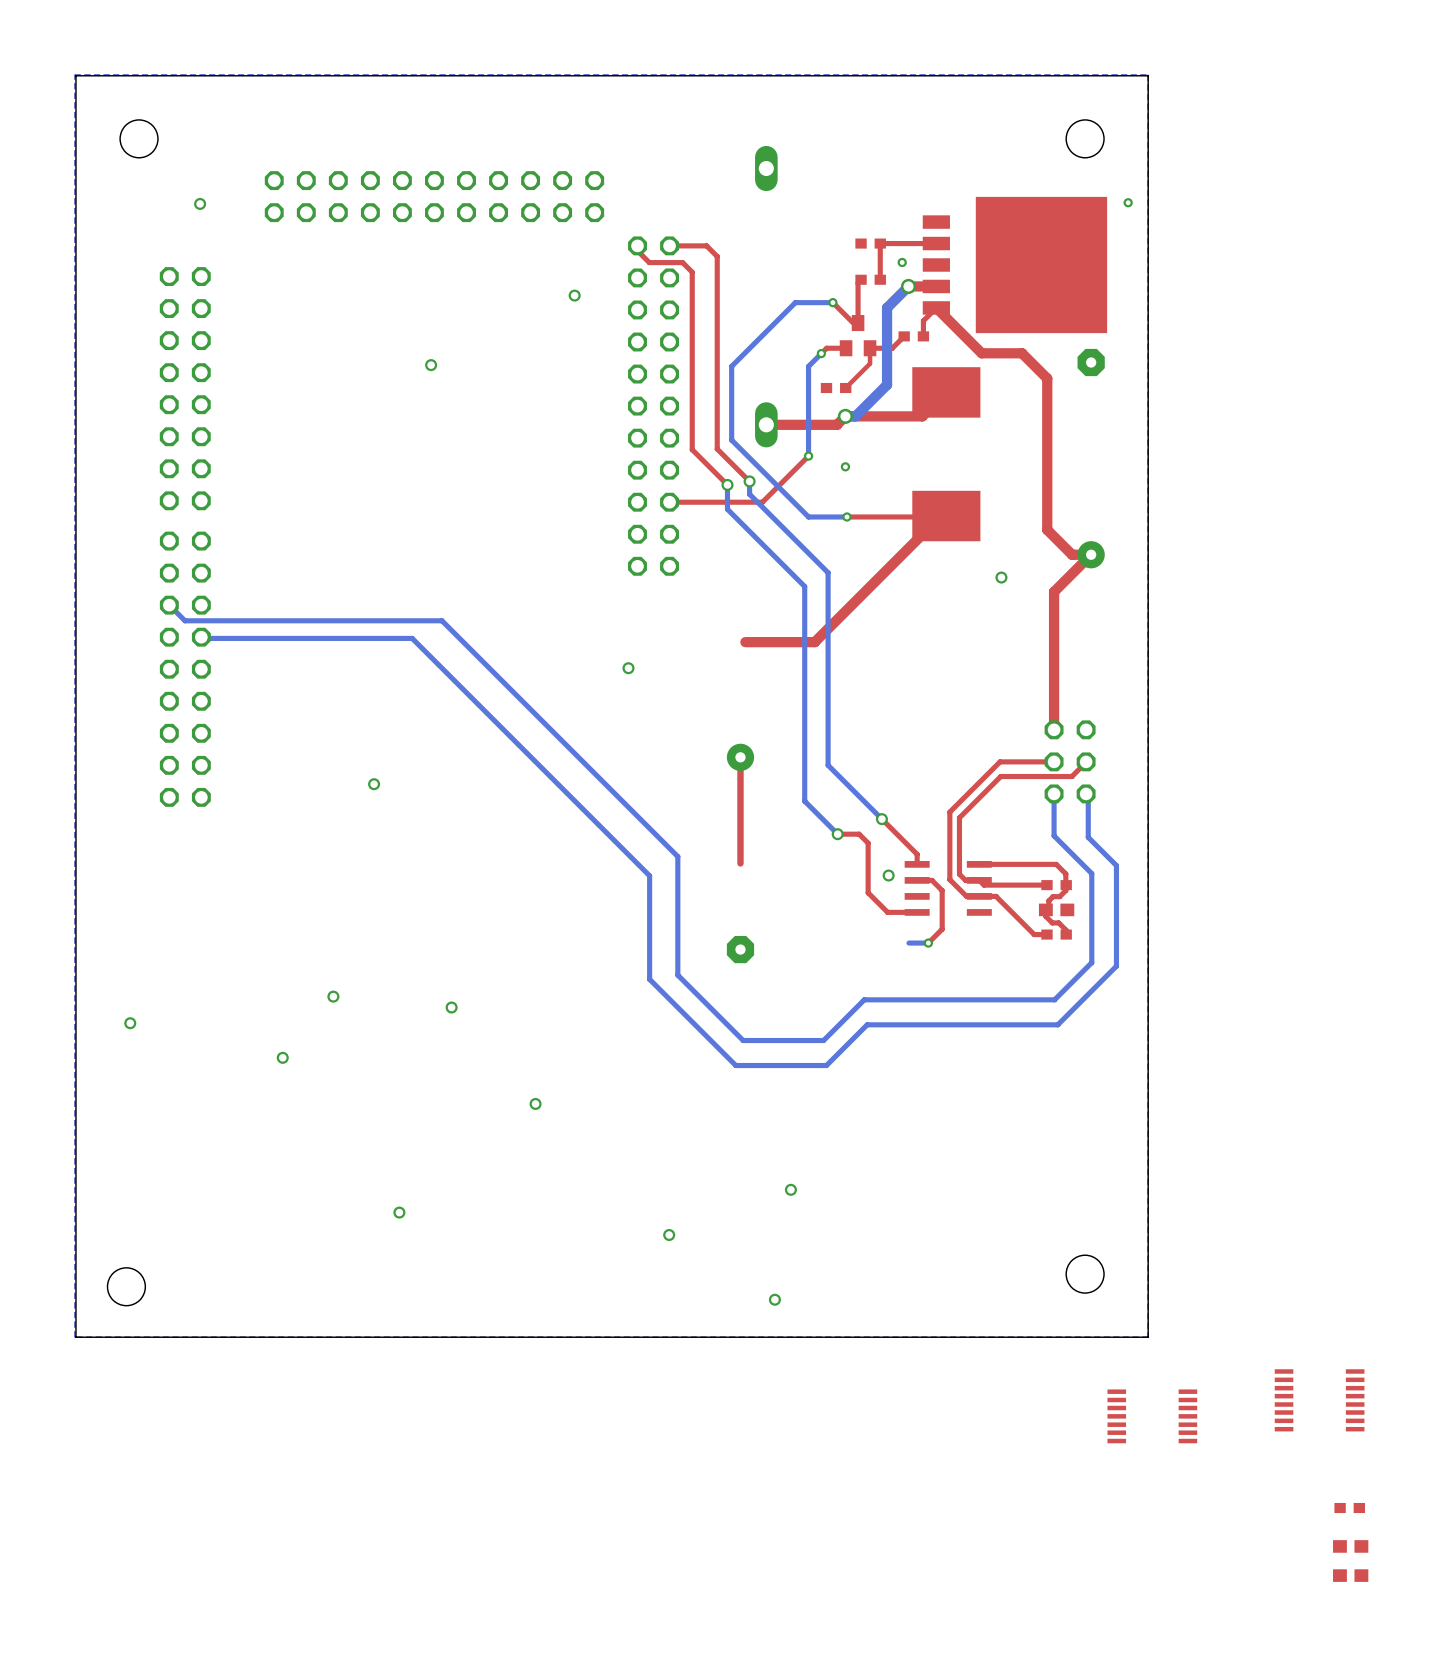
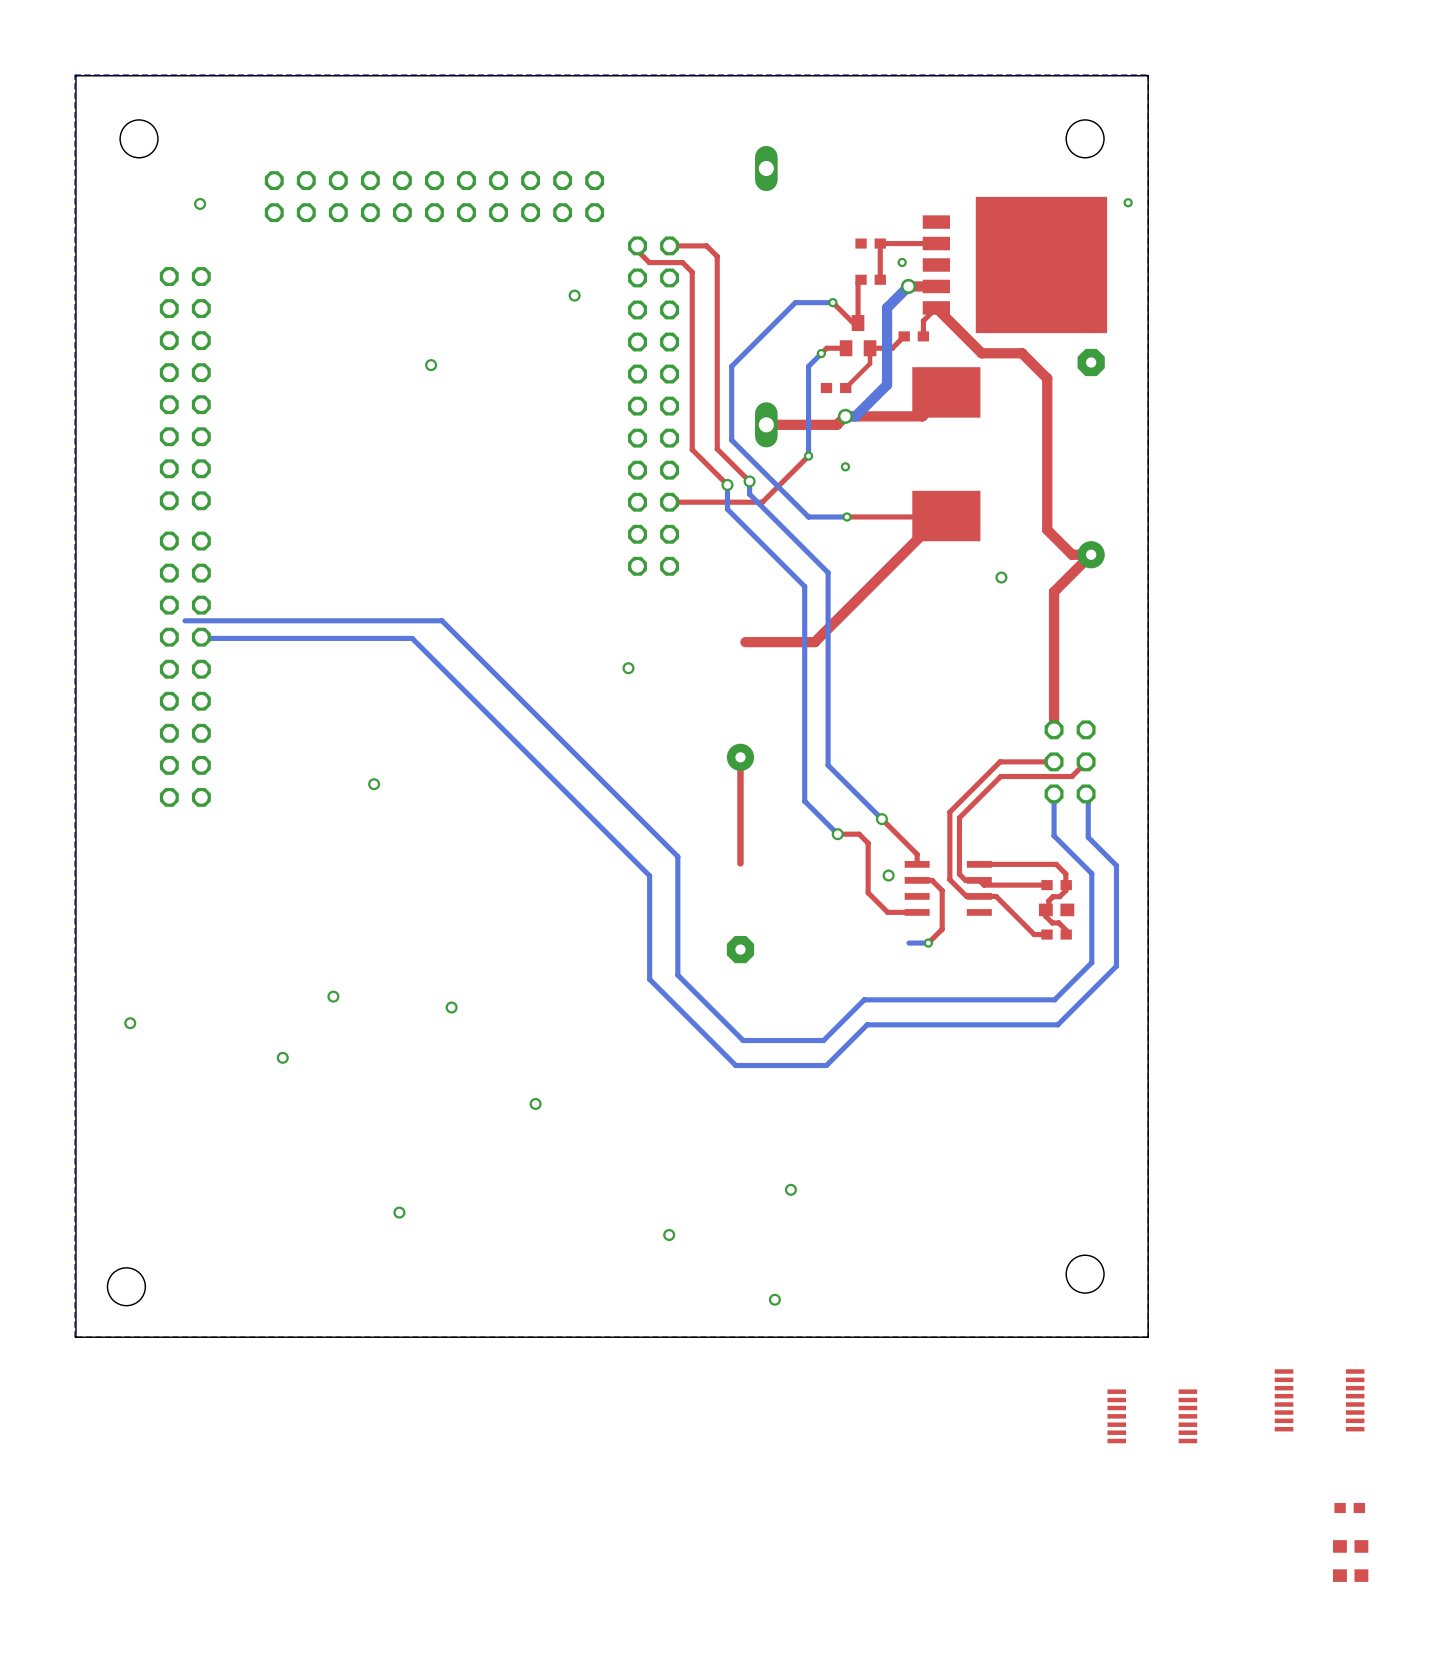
bottom track: (169, 605) (184, 620) -> none

